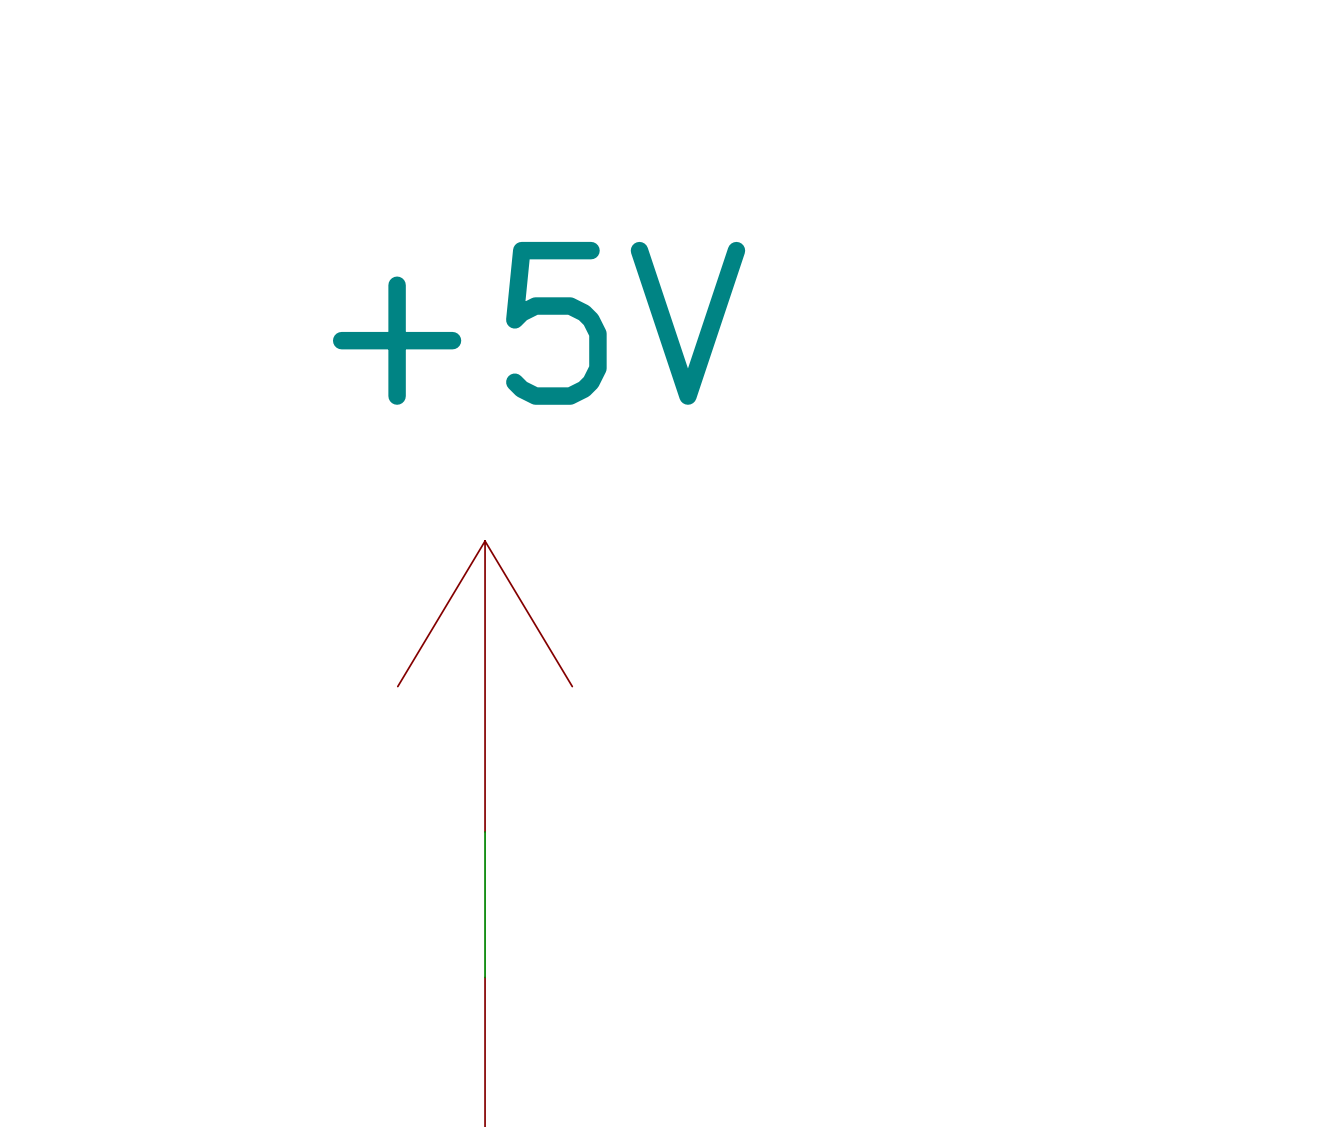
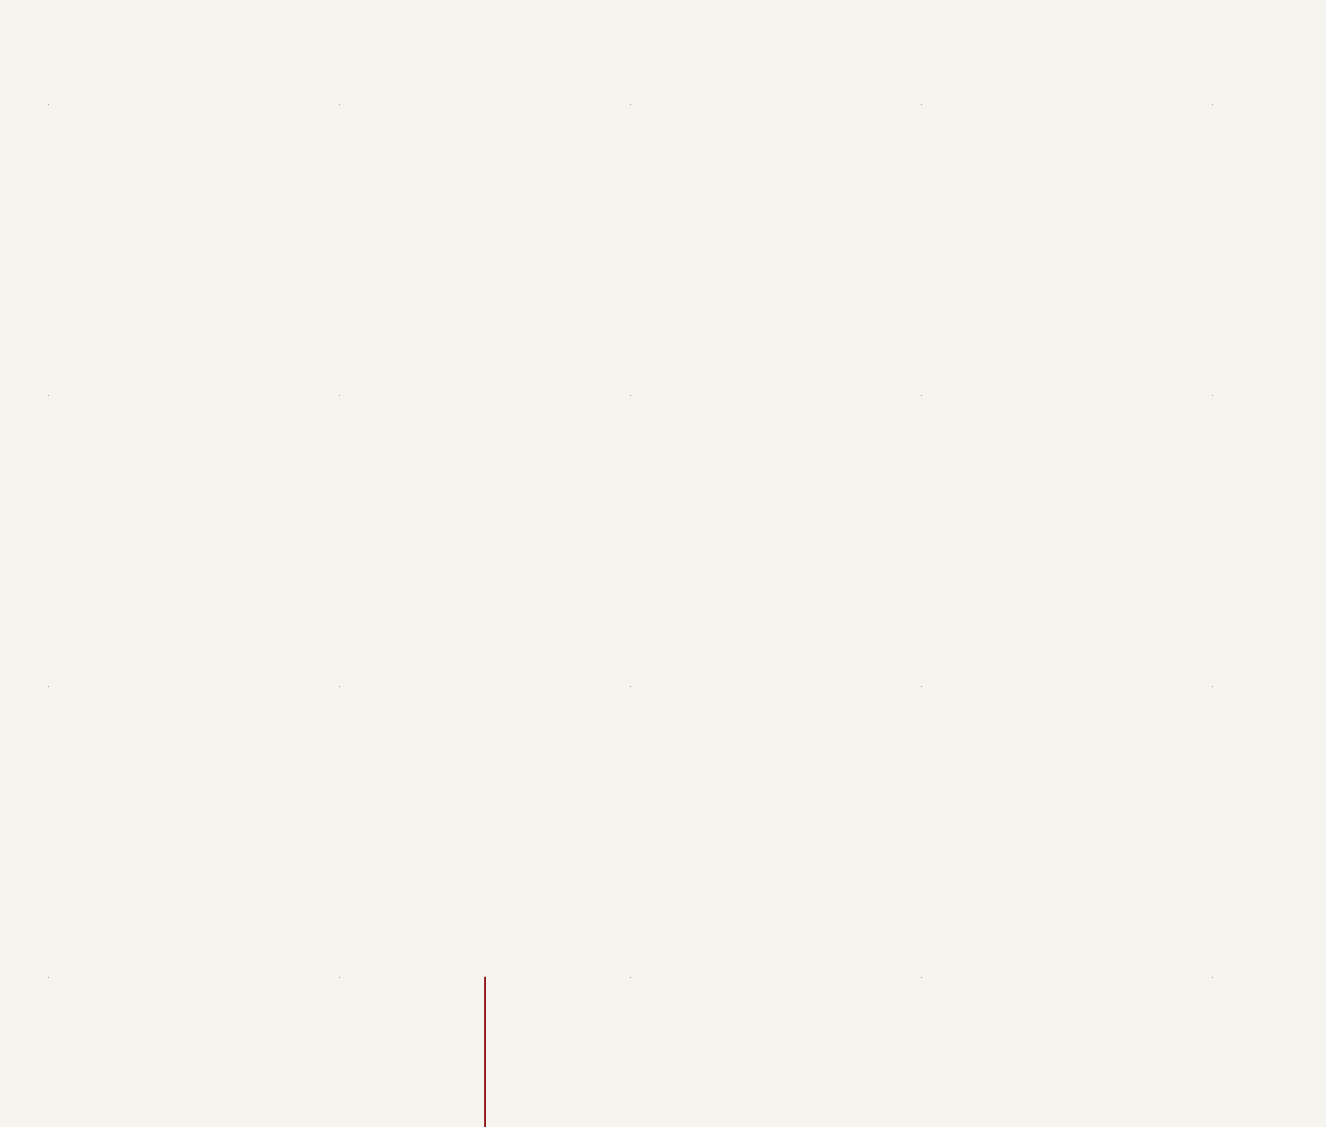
power symbol: +5V (485, 686) -> none
wire: (485, 831) (485, 977) -> none

